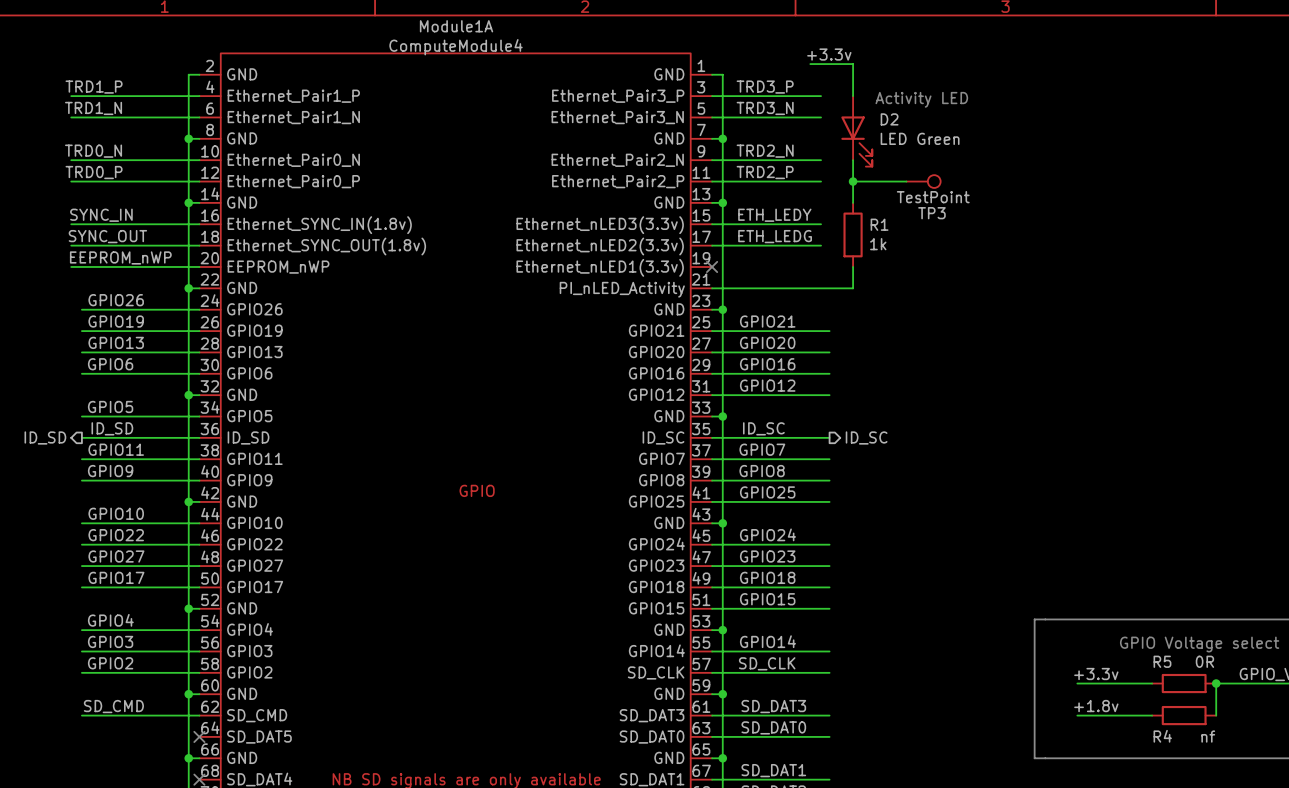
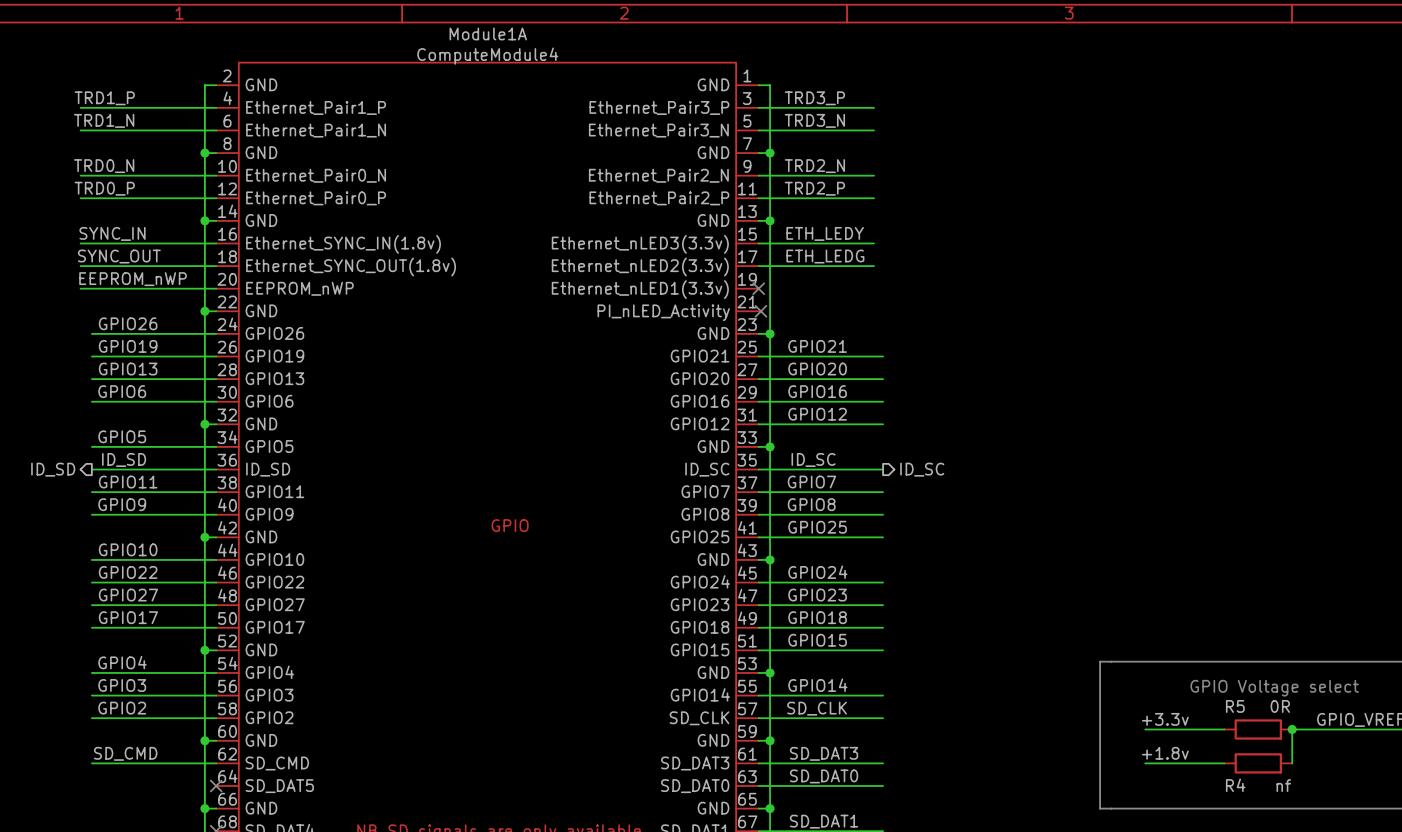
label: +3.3v (829, 54) -> none
wire: (810, 64) (853, 64) (853, 96) -> none
text: Activity LED (921, 99) -> none
D2: LED Green (856, 131) -> none
wire: (853, 160) (853, 202) -> none
wire: (853, 181) (906, 181) -> none
junction: (853, 181) -> none
TP3: TestPoint (923, 181) -> none
R1: 1k (853, 234) -> none
wire: (853, 266) (853, 288) (712, 288) -> none
no-connect mark: none -> (760, 311)

